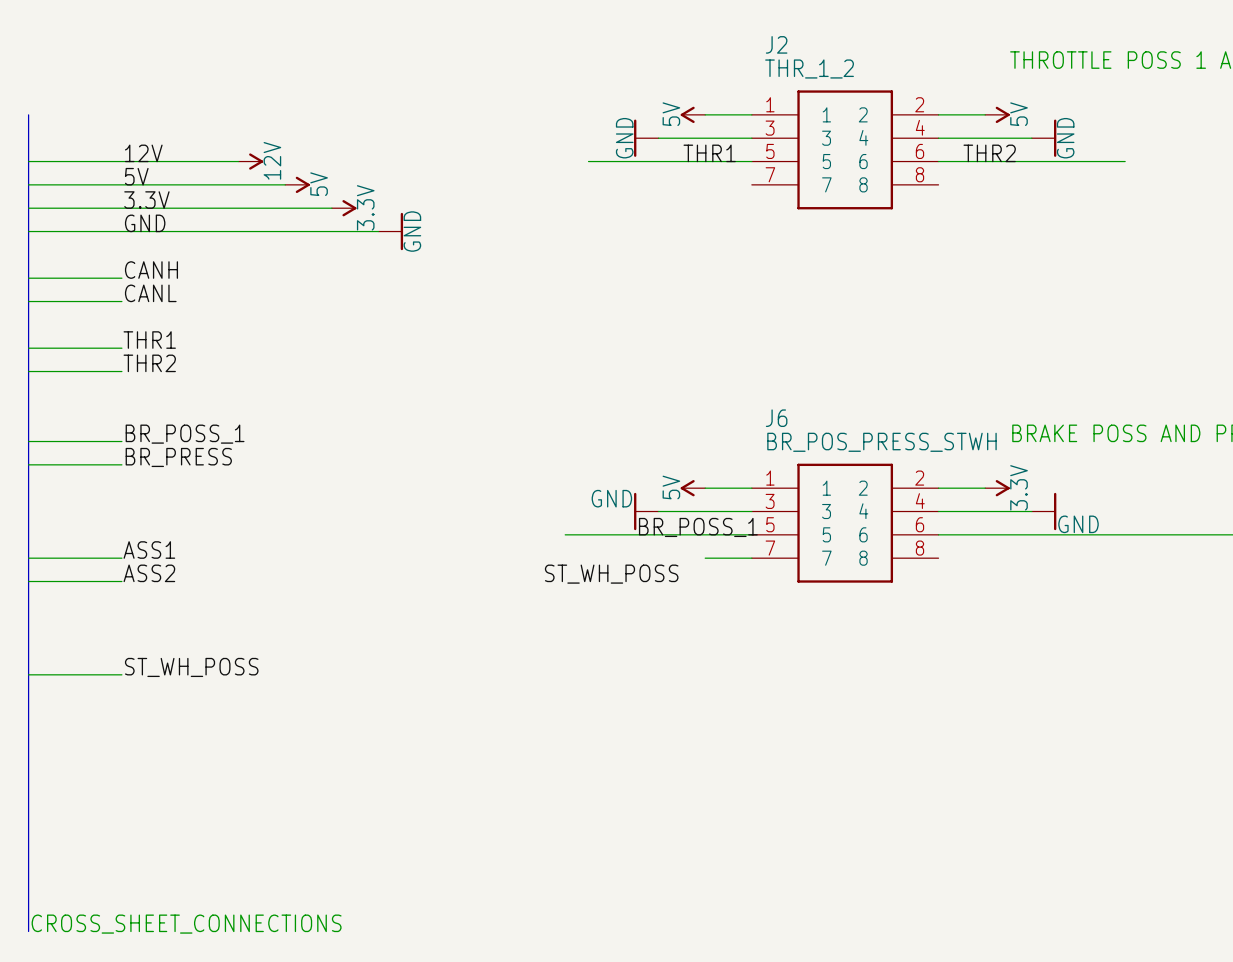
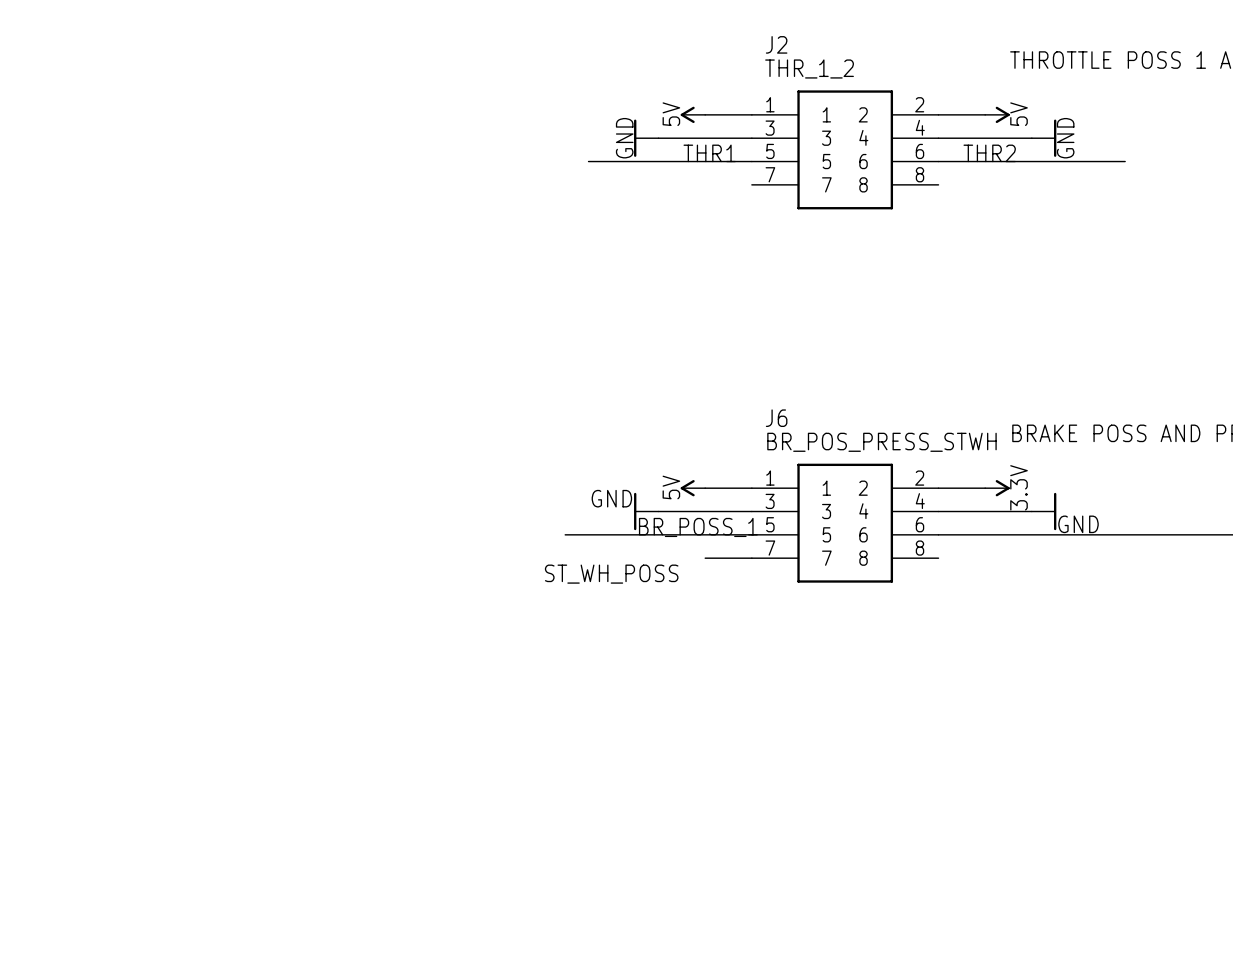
bus: (28, 114) (28, 931) -> none
label: 12V (143, 153) -> none
wire: (28, 161) (238, 161) -> none
power symbol: 12V (250, 161) -> none
label: 5V (136, 176) -> none
wire: (28, 184) (285, 184) -> none
power symbol: 5V (297, 184) -> none
label: 3.3V (146, 200) -> none
wire: (28, 208) (331, 208) -> none
power symbol: 3.3V (344, 208) -> none
label: GND (145, 223) -> none
wire: (28, 231) (378, 231) -> none
power symbol: GND (390, 231) -> none
label: CANH (151, 270) -> none
wire: (28, 278) (121, 278) -> none
label: CANL (150, 293) -> none
wire: (28, 301) (121, 301) -> none
label: THR1 (149, 340) -> none
wire: (28, 348) (121, 348) -> none
label: THR2 (149, 363) -> none
wire: (28, 371) (121, 371) -> none
label: BR_POSS_1 (185, 434) -> none
wire: (28, 441) (121, 441) -> none
label: BR_PRESS (178, 457) -> none
wire: (28, 464) (121, 464) -> none
label: ASS1 (149, 550) -> none
wire: (28, 558) (121, 558) -> none
label: ASS2 (149, 573) -> none
wire: (28, 581) (121, 581) -> none
label: ST_WH_POSS (191, 667) -> none
wire: (28, 674) (121, 674) -> none
text: CROSS_SHEET_CONNECTIONS (186, 924) -> none

